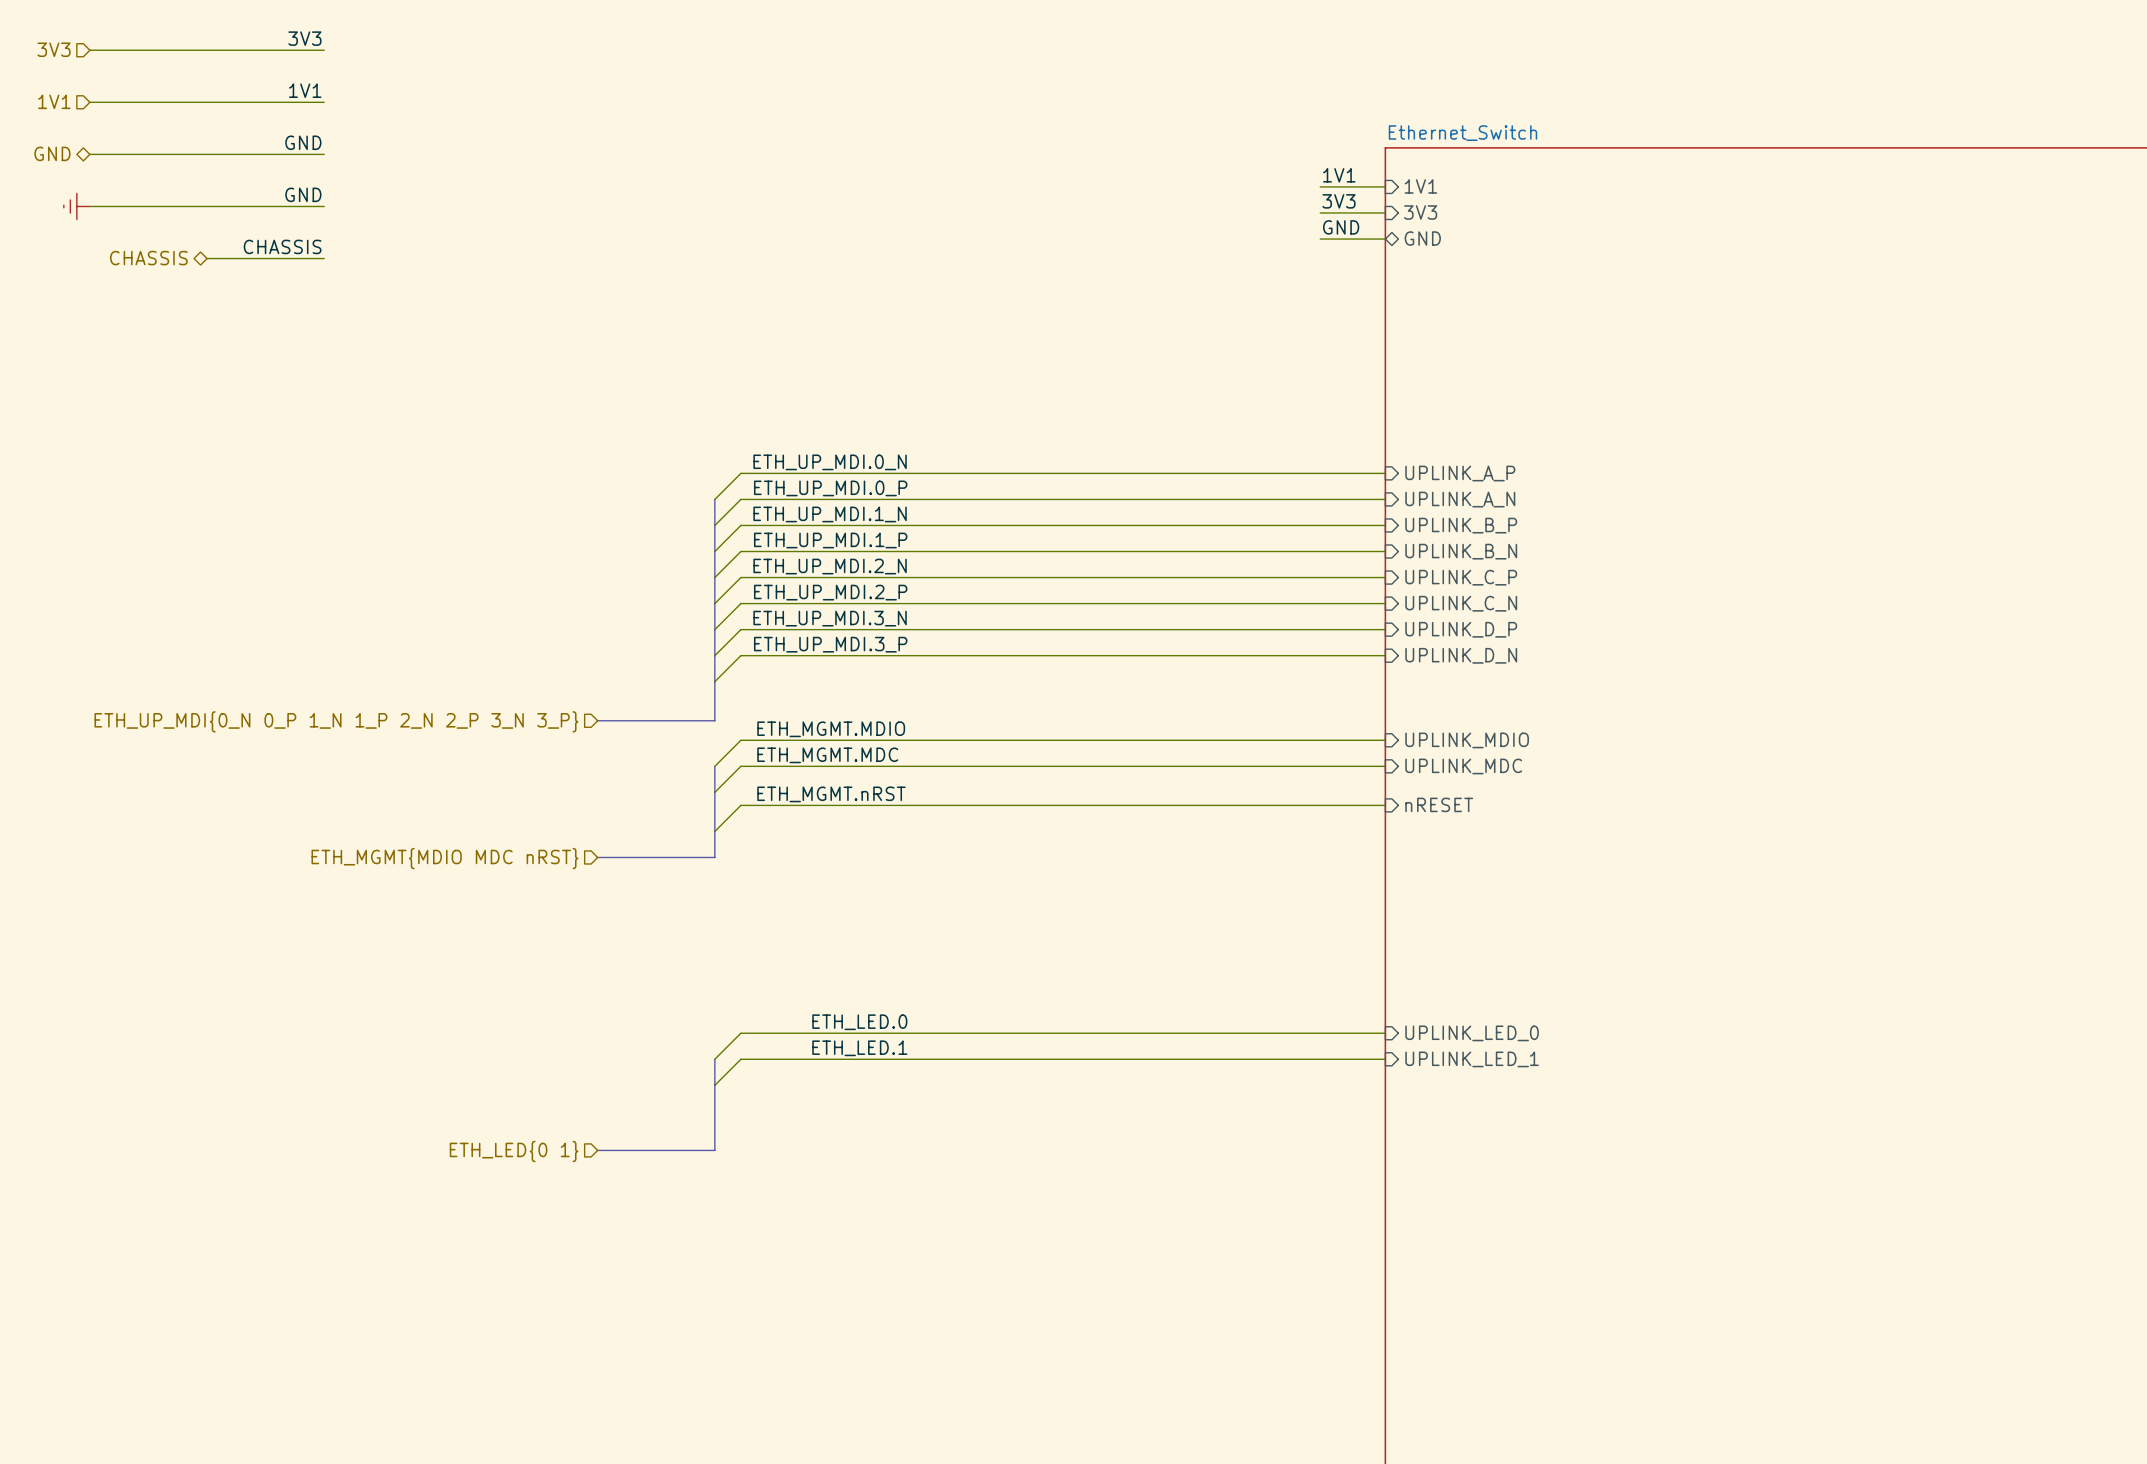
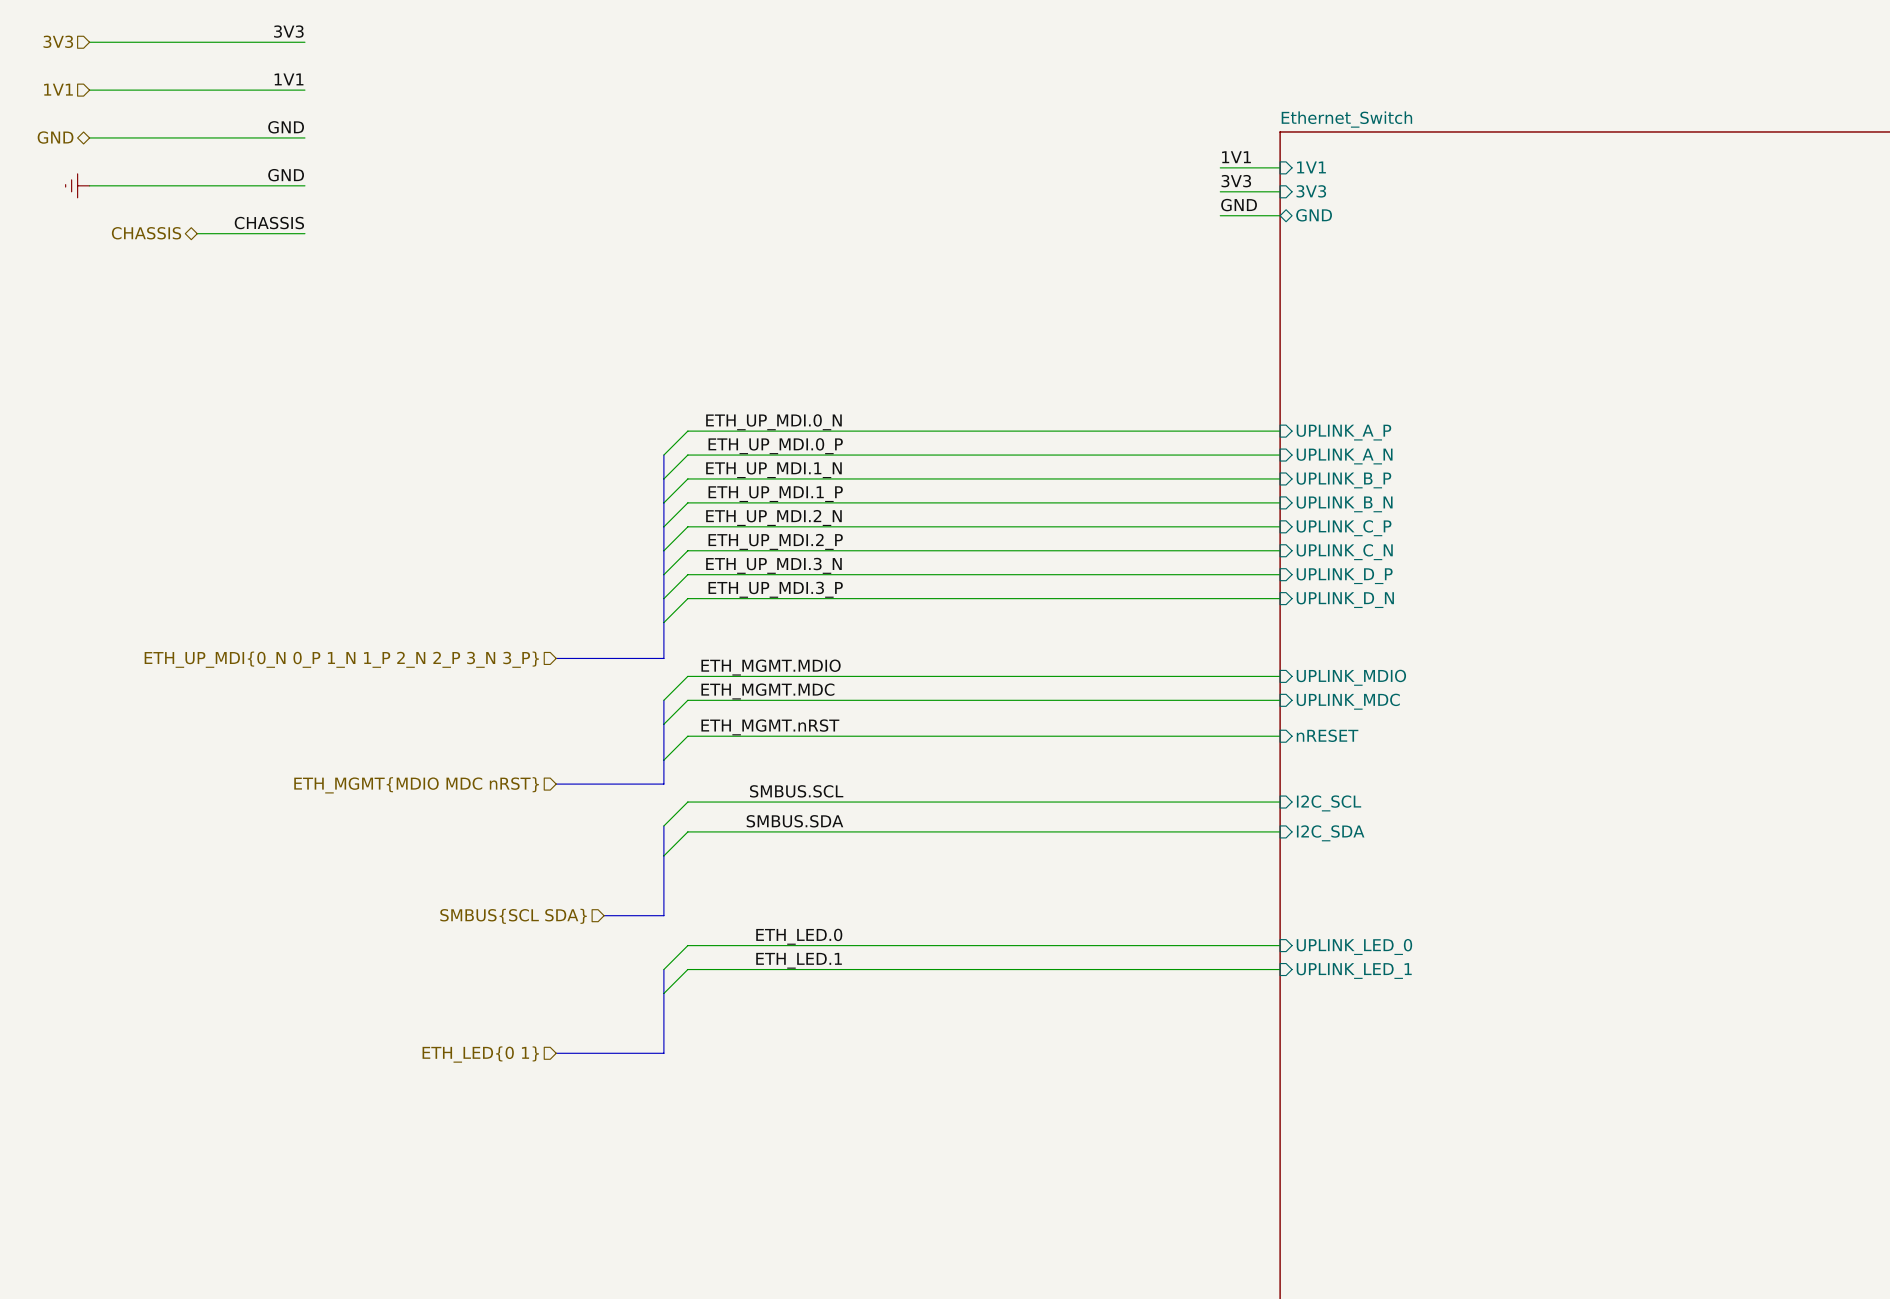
label: none -> SMBUS.SCL (796, 791)
wire: none -> (1280, 802) (687, 802) (663, 825)
sheet pin: none -> I2C_SCL (1329, 803)
label: none -> SMBUS.SDA (794, 821)
bus: none -> (663, 825) (663, 915) (604, 915)
wire: none -> (1280, 831) (687, 831) (663, 855)
sheet pin: none -> I2C_SDA (1330, 833)
hierarchical label: none -> SMBUS{SCL SDA} (513, 916)

